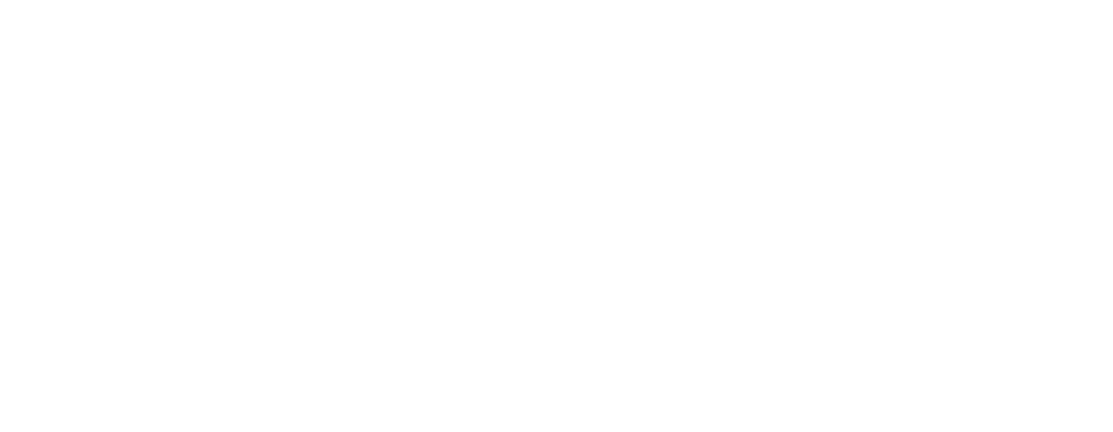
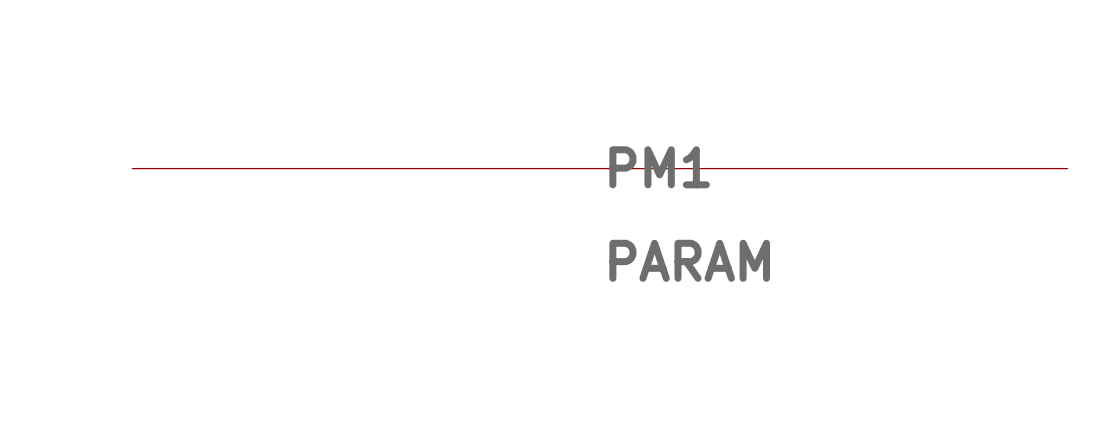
PM1: none -> PARAM (599, 168)

